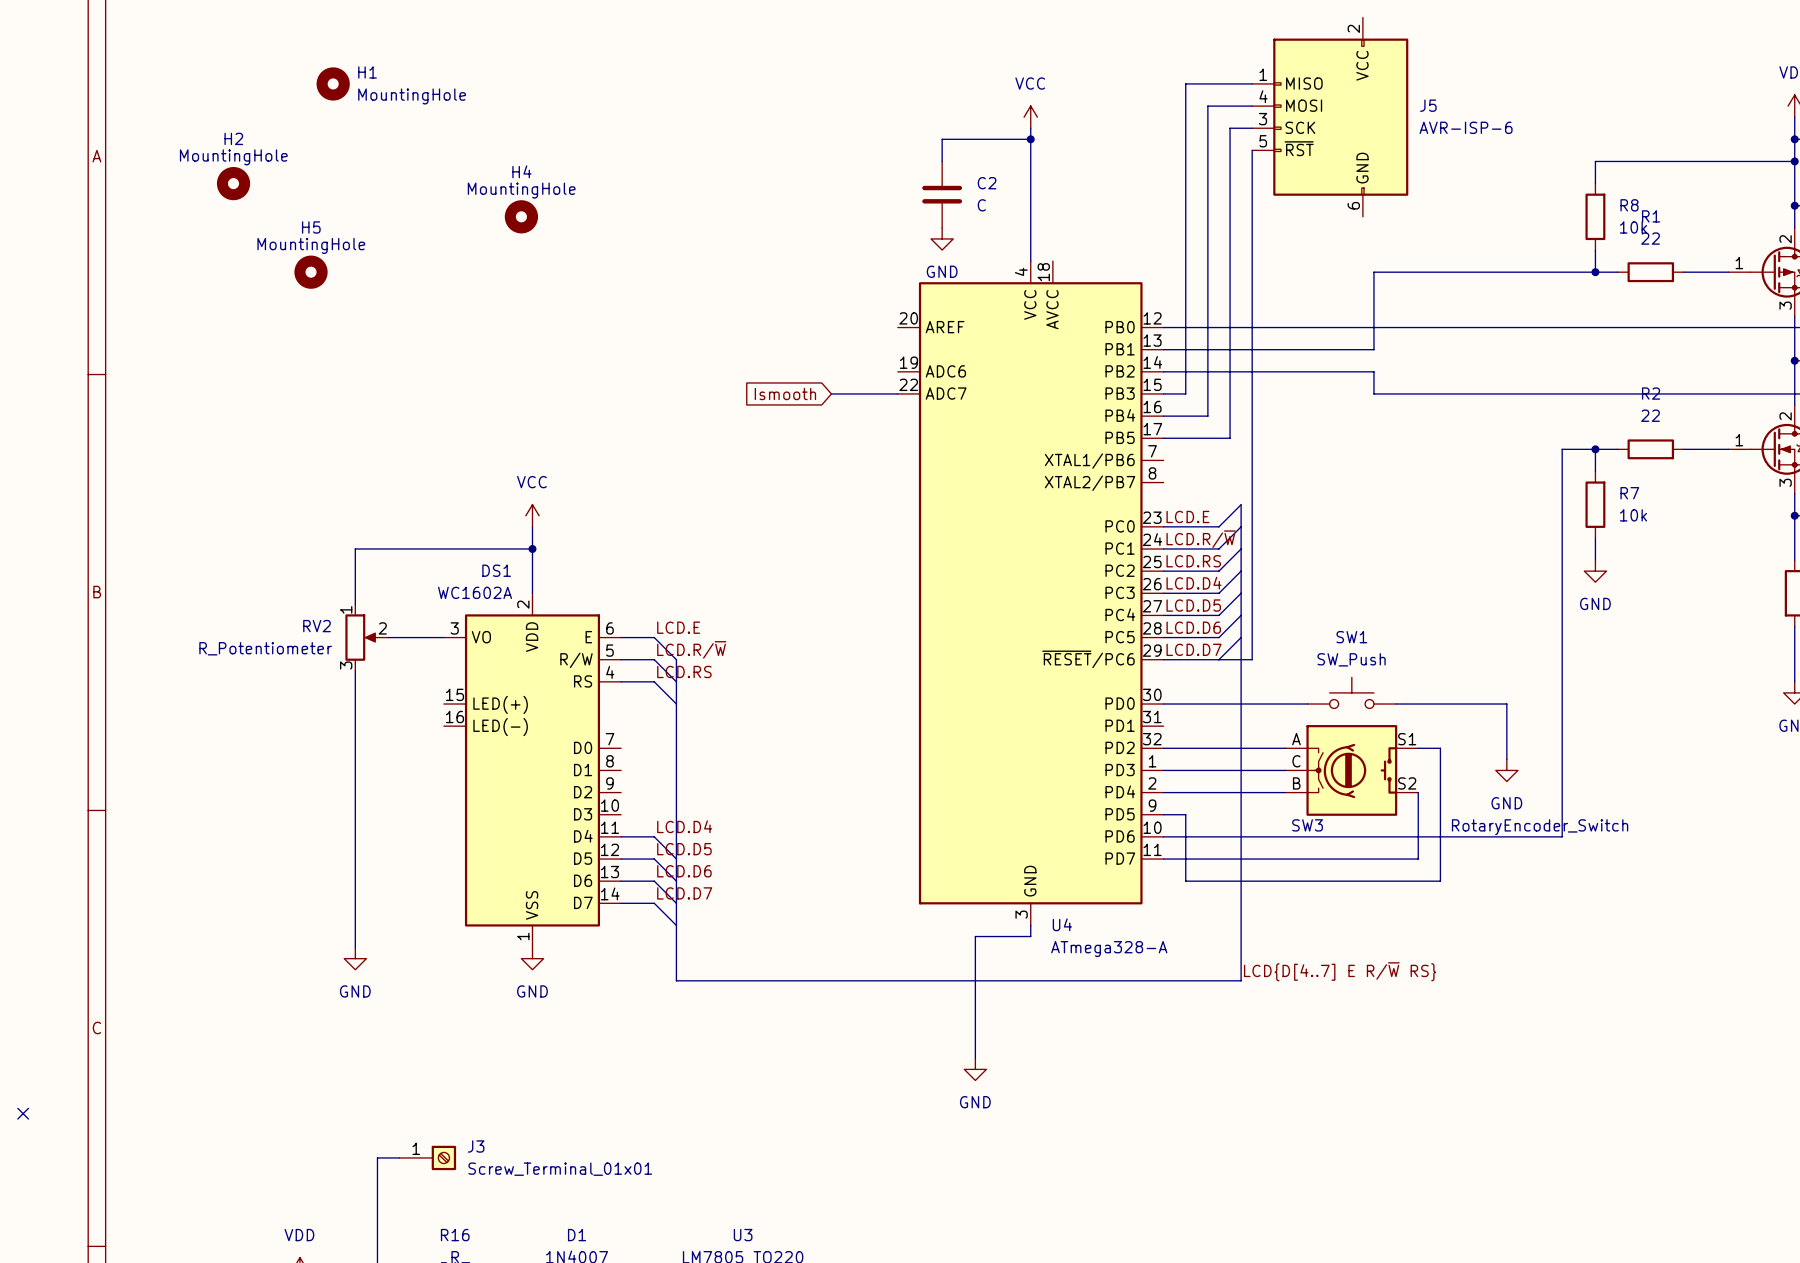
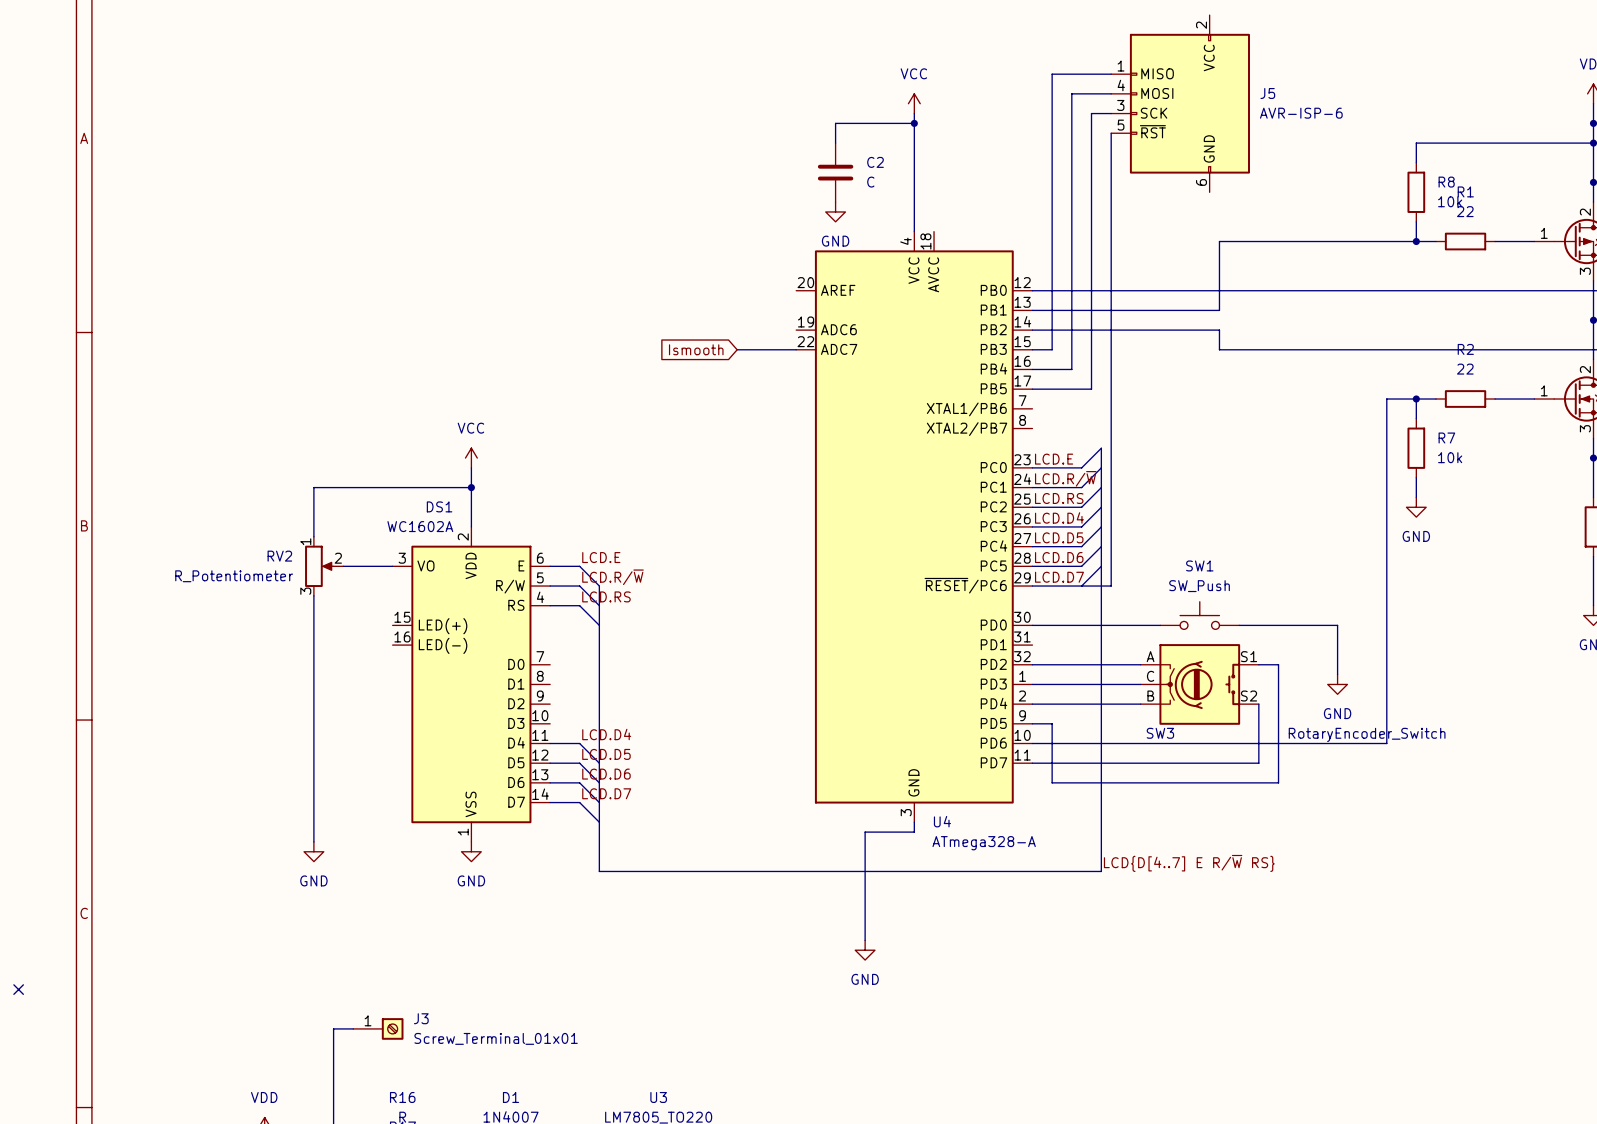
H1: MountingHole (333, 83) -> none
H2: MountingHole (233, 183) -> none
H4: MountingHole (521, 216) -> none
H5: MountingHole (311, 272) -> none

